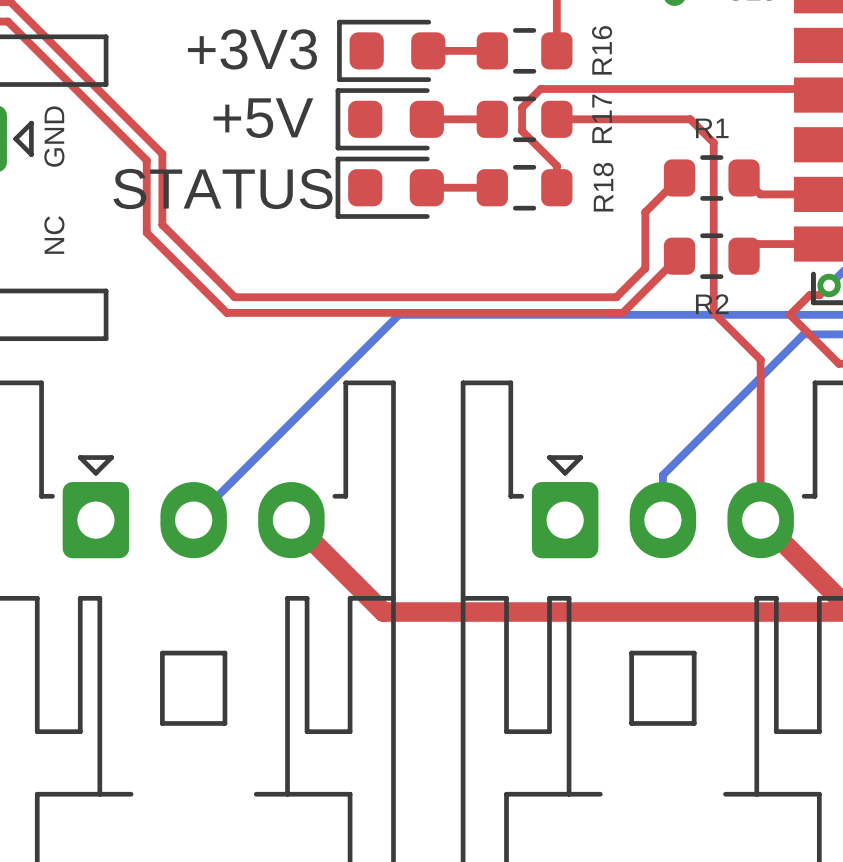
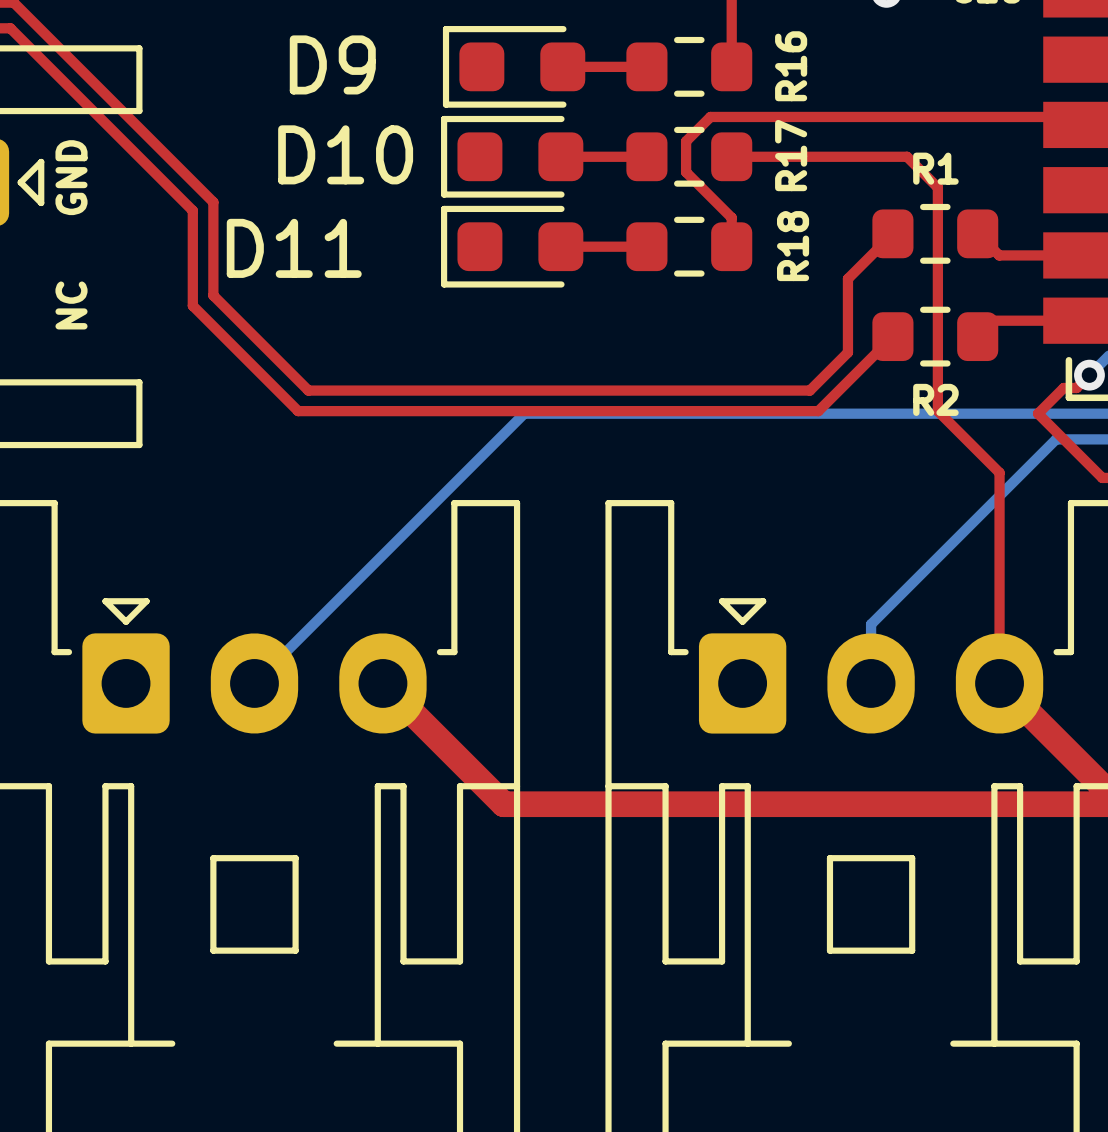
+3V3 name: +3V3 (252, 49) -> D9 (332, 64)
+5V name: +5V (263, 118) -> D10 (345, 154)
STATUS name: STATUS (222, 189) -> D11 (294, 248)

